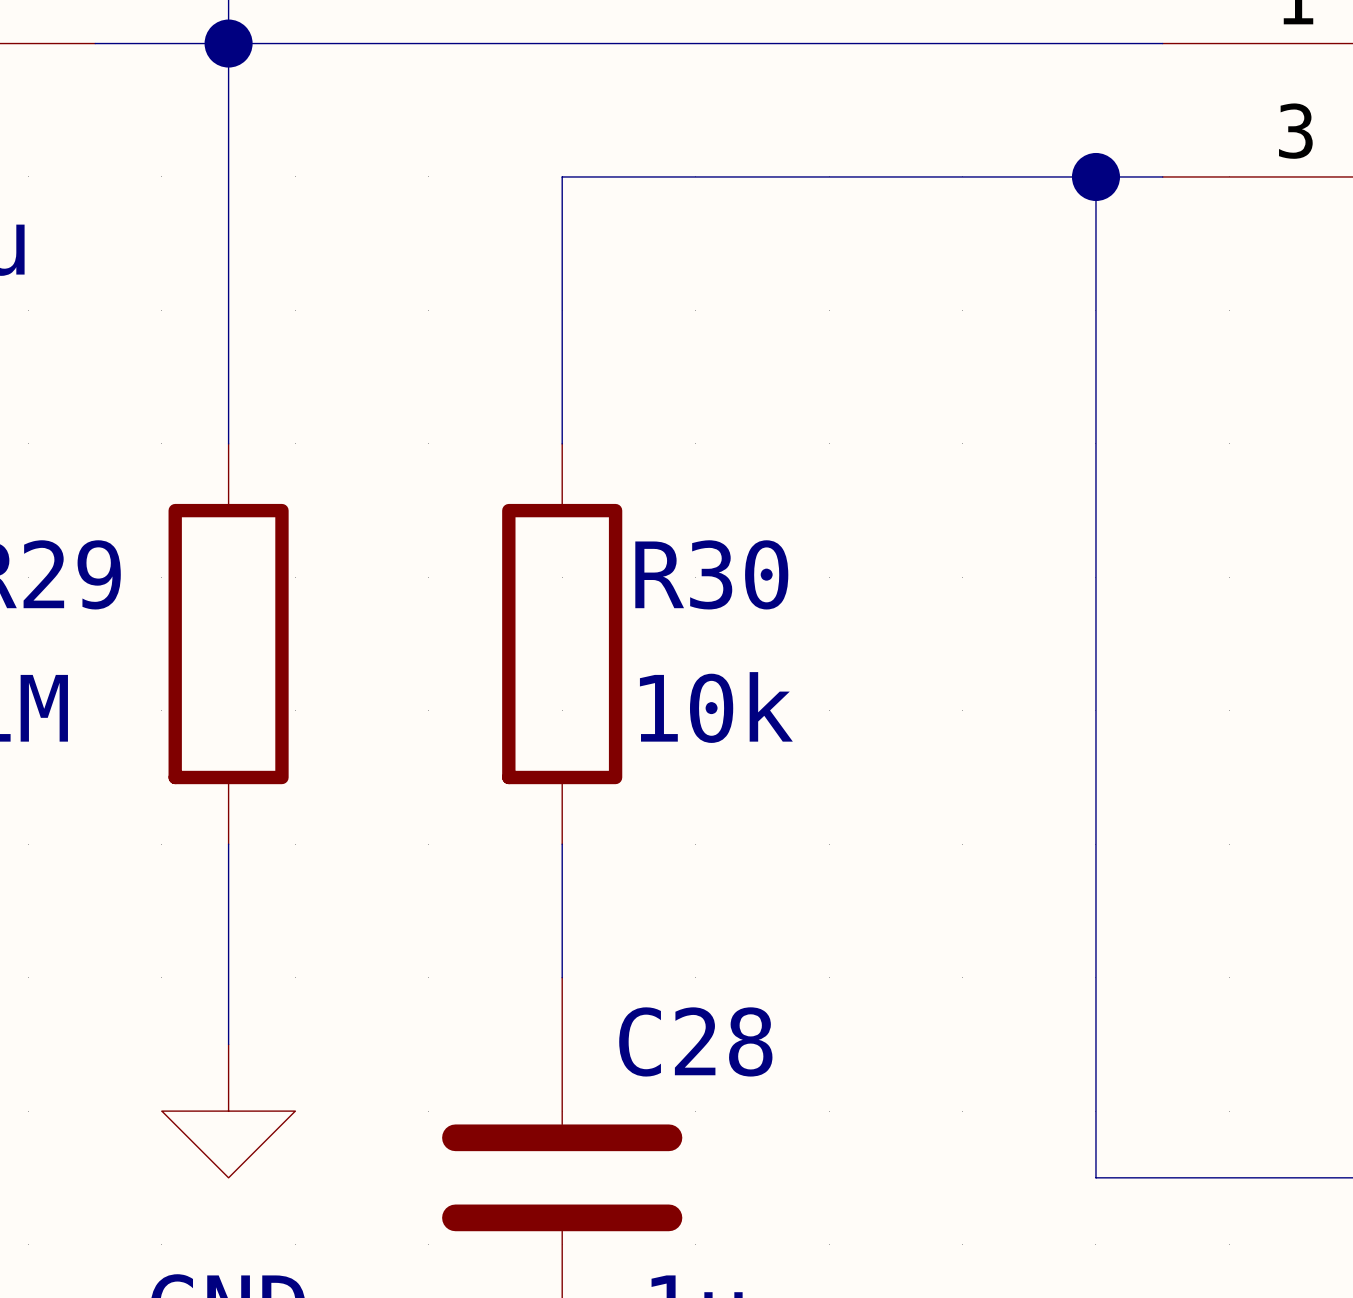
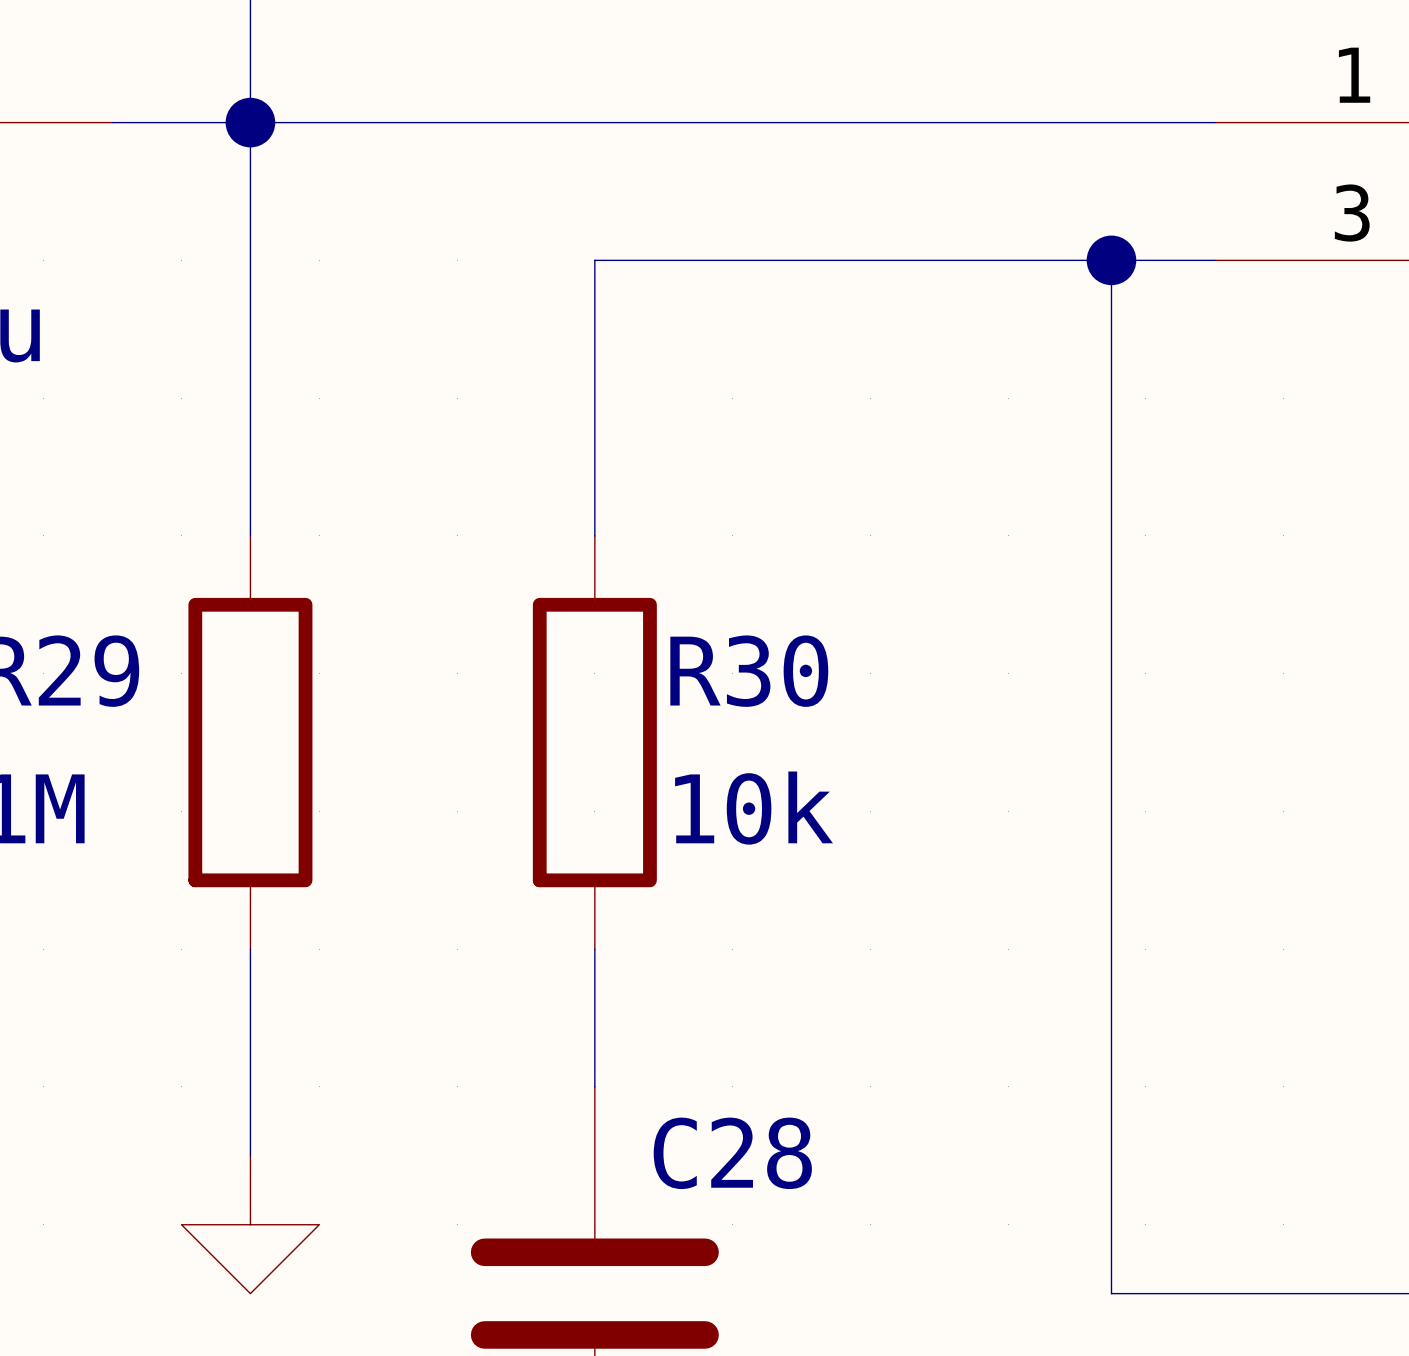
wire: (1095, 176) (1095, 1177) -> (1111, 260) (1111, 1293) (1145, 1293)
junction position: (1095, 176) -> (1111, 260)

